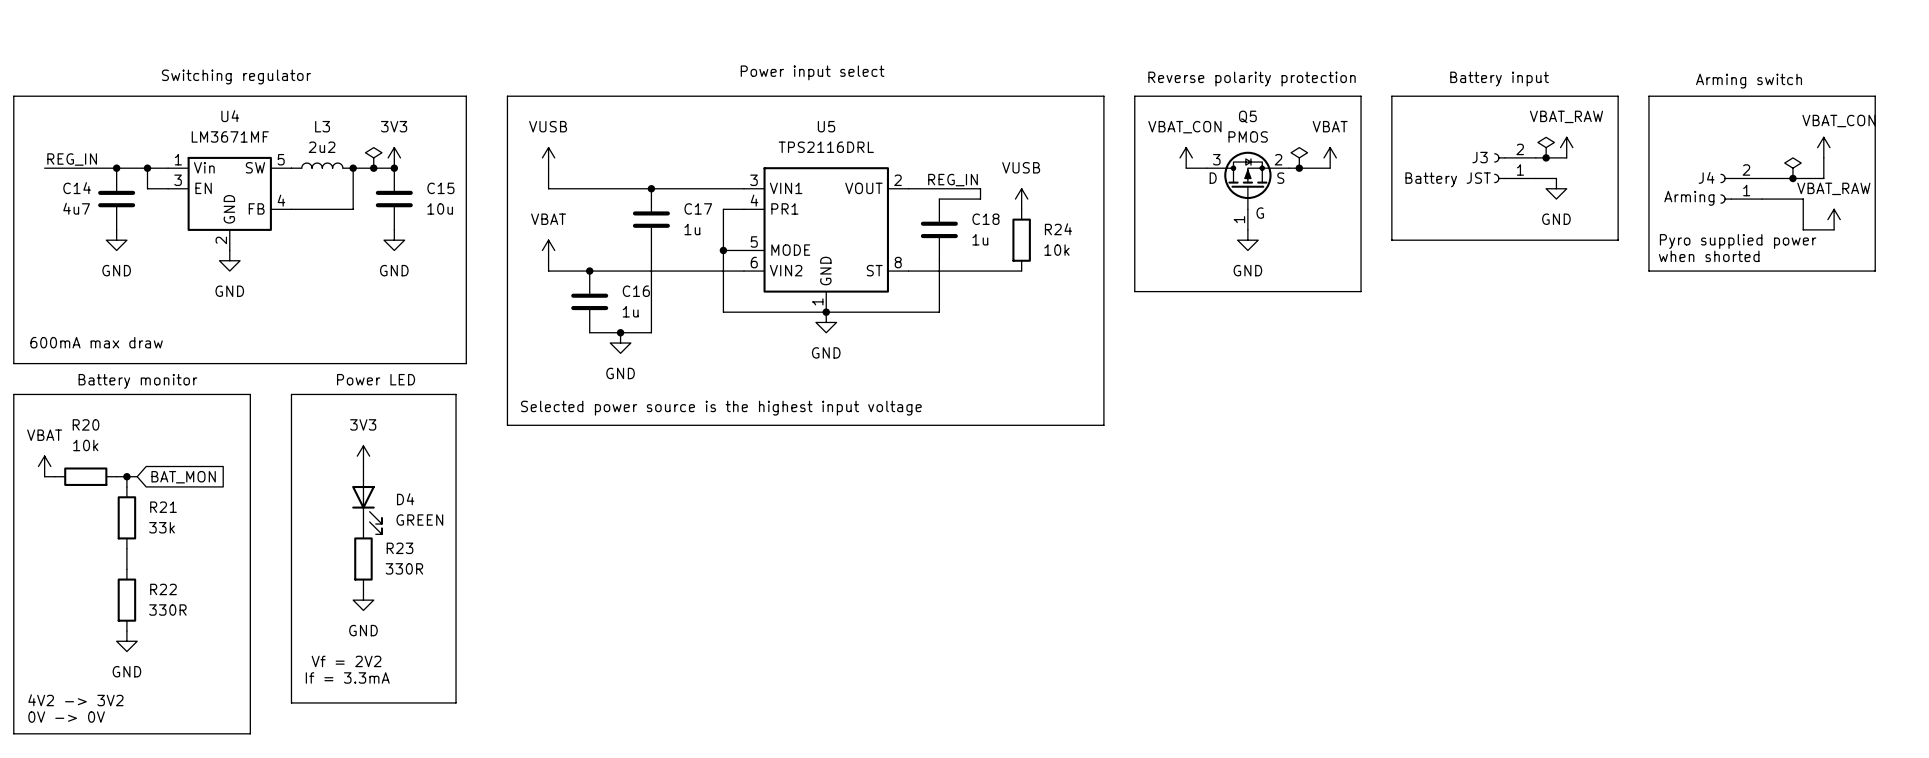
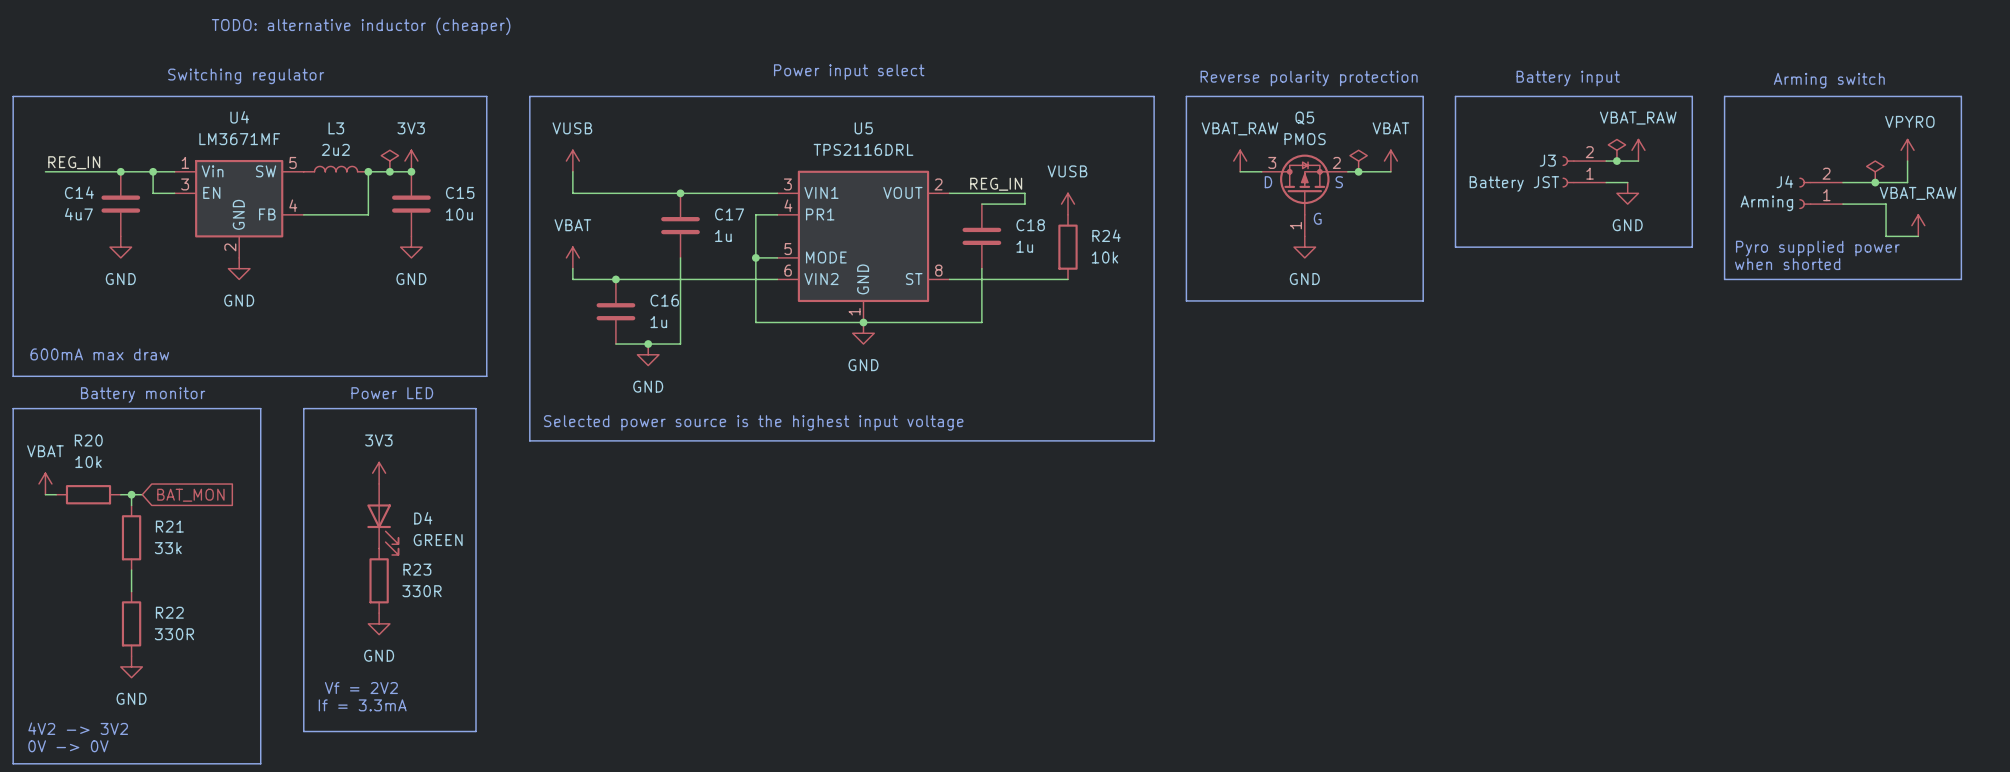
text: none -> TODO: alternative inductor (cheaper) (361, 26)
power symbol: VBAT_CON (1823, 147) -> VPYRO (1907, 150)
power symbol: VBAT_CON (1186, 157) -> VBAT_RAW (1240, 161)

